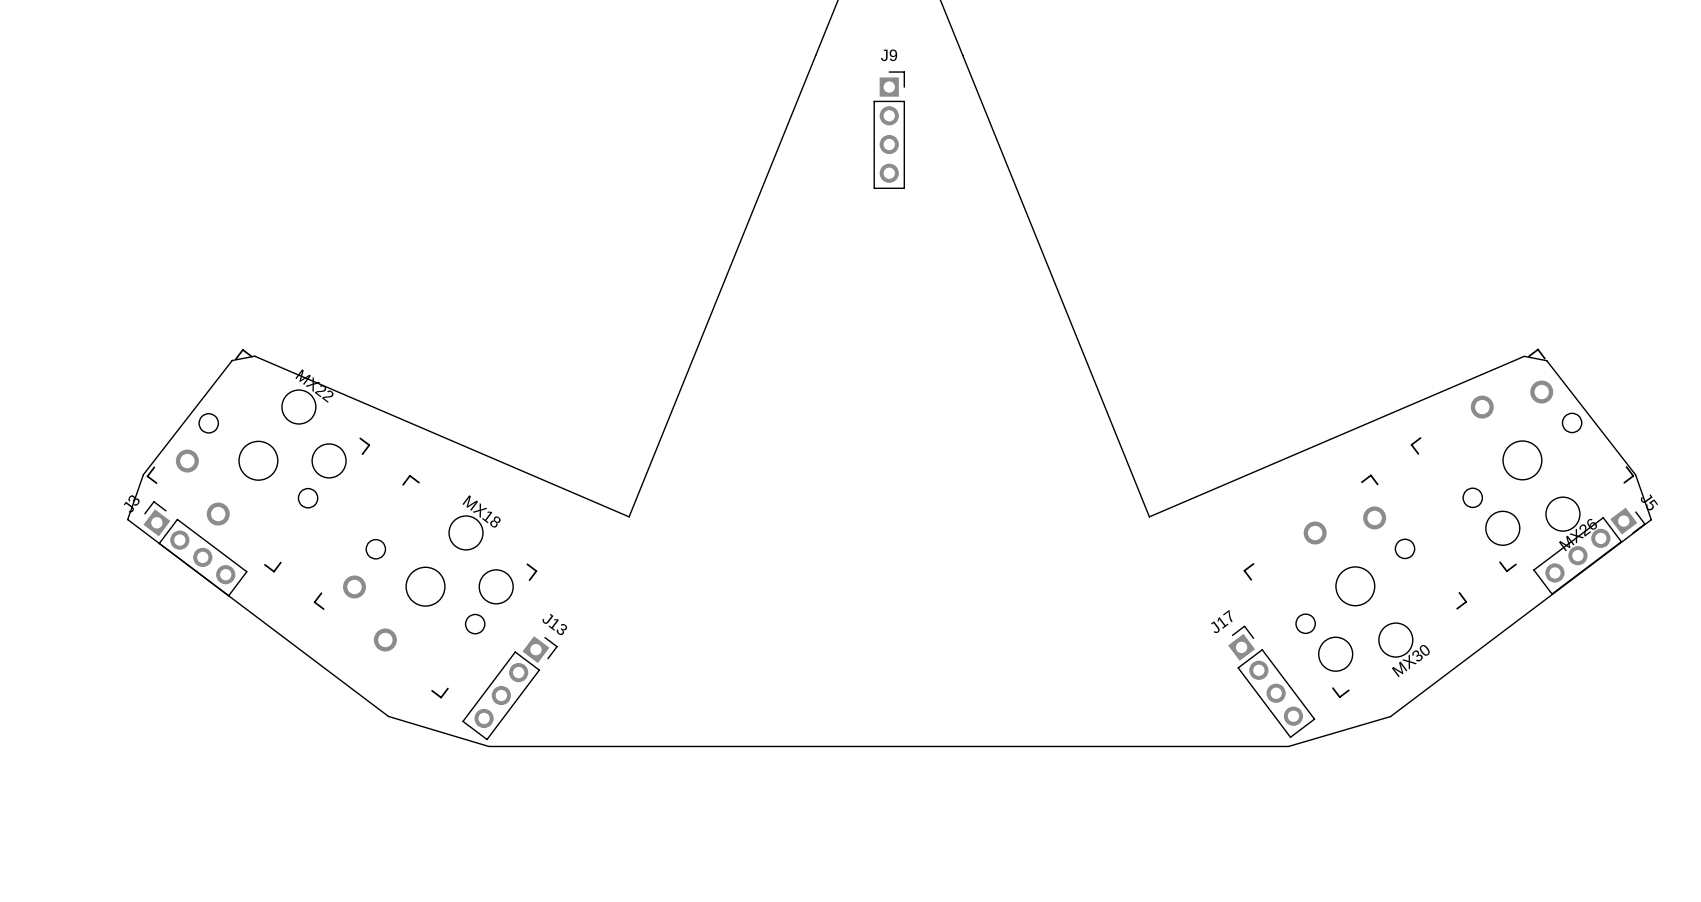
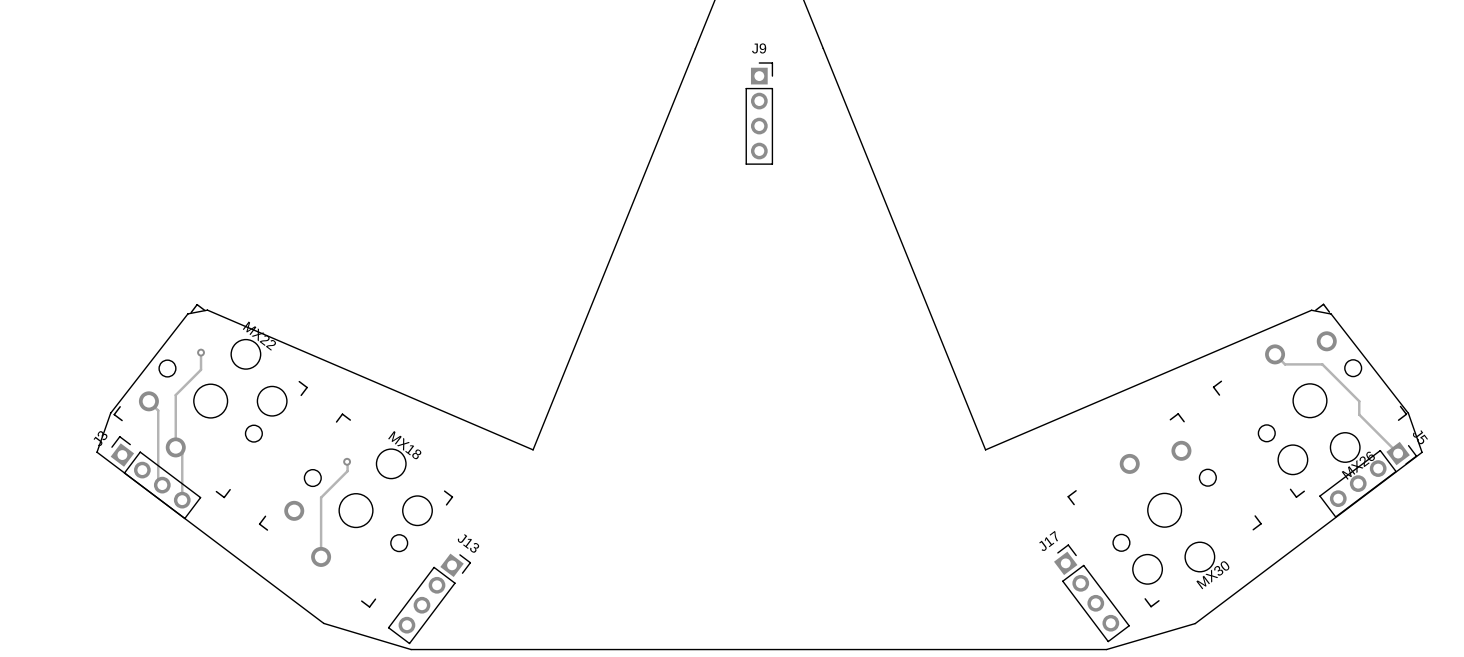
track: none -> (201, 352) (201, 369) (175, 395) (175, 447) (182, 453) (182, 500)
via: none -> (201, 352)
track: none -> (1275, 354) (1285, 364) (1322, 364) (1359, 401) (1359, 414) (1398, 453)
track: none -> (148, 401) (158, 410) (158, 481) (162, 485)
track: none -> (347, 461) (347, 471) (321, 497) (321, 556)
via: none -> (347, 461)

